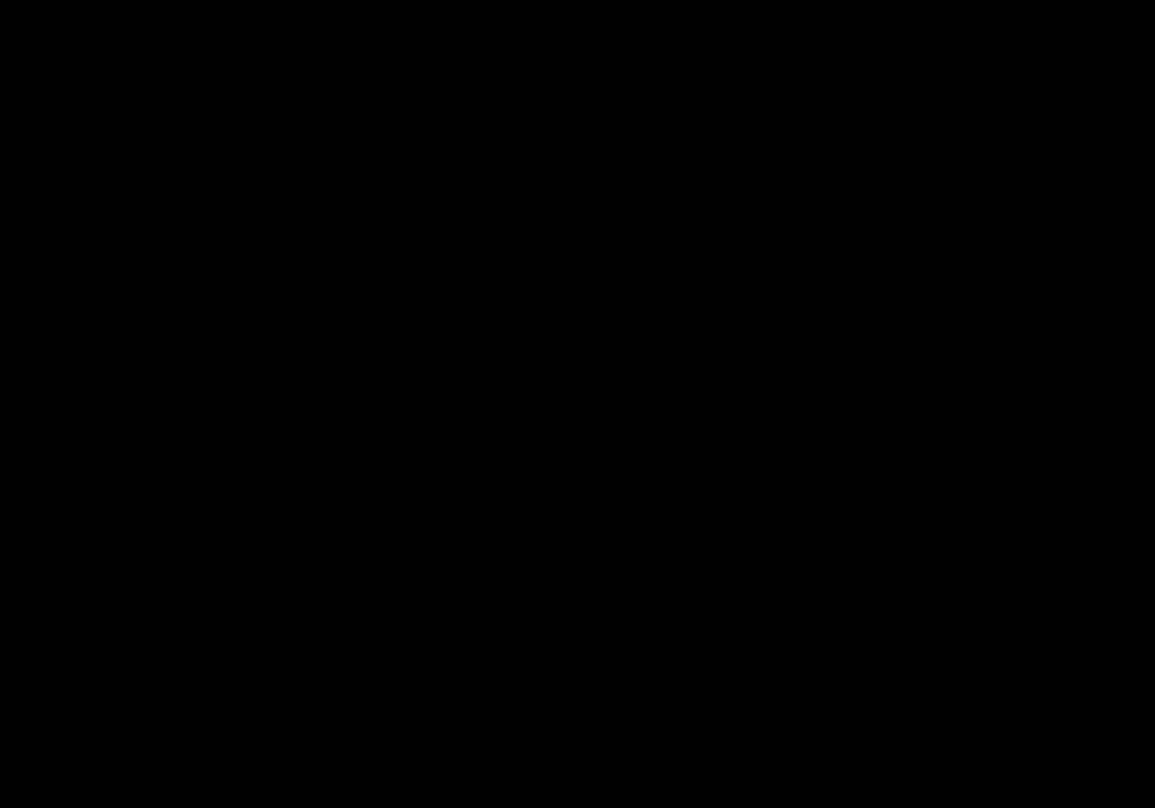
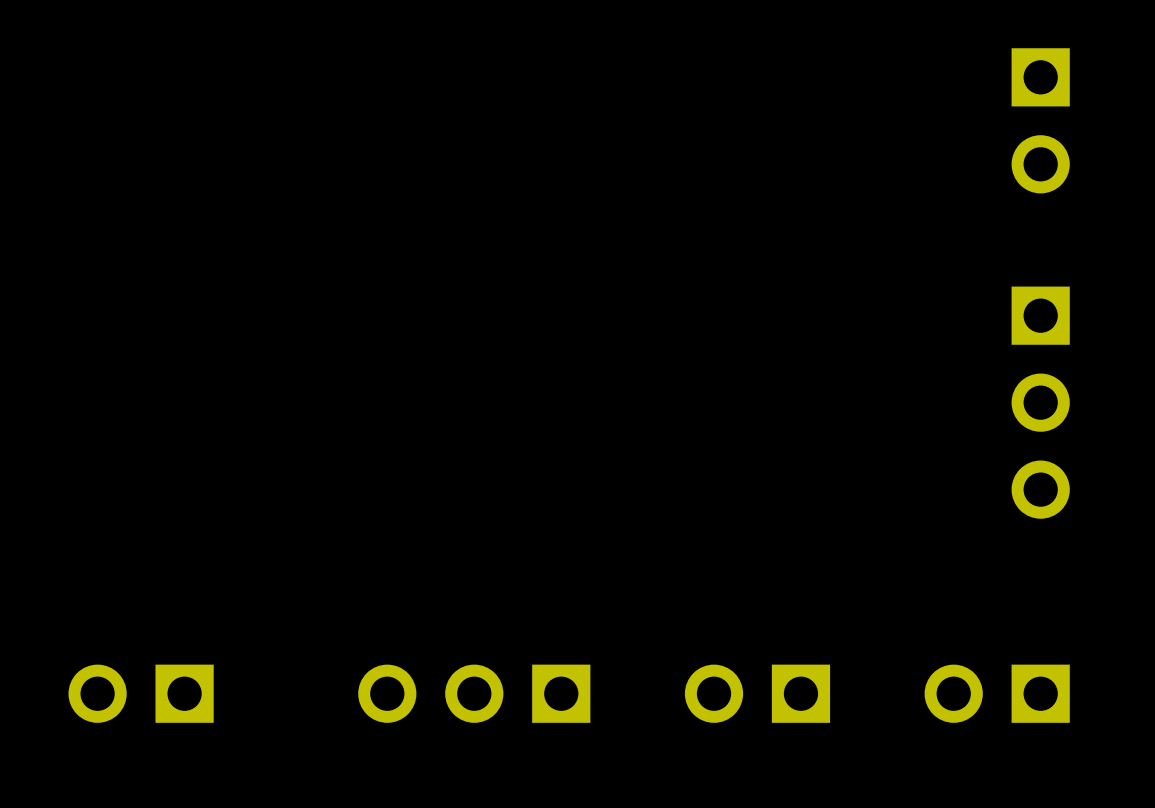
part: none -> (1040, 120)
part: none -> (1040, 402)
part: none -> (141, 693)
part: none -> (474, 693)
part: none -> (757, 693)
part: none -> (997, 693)

